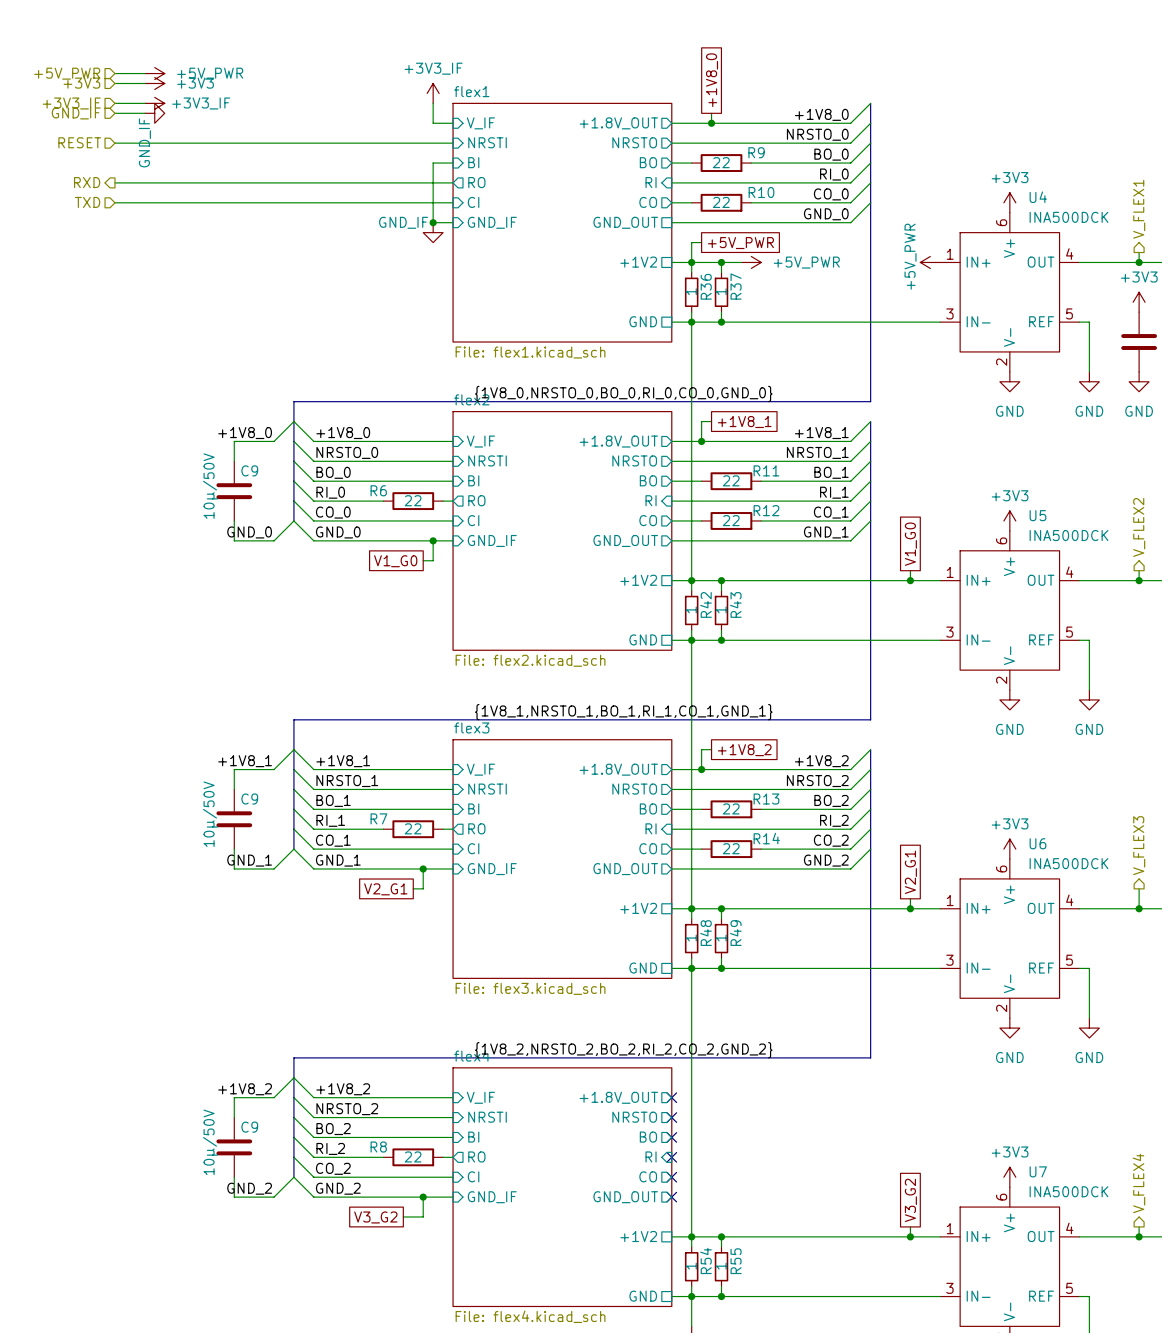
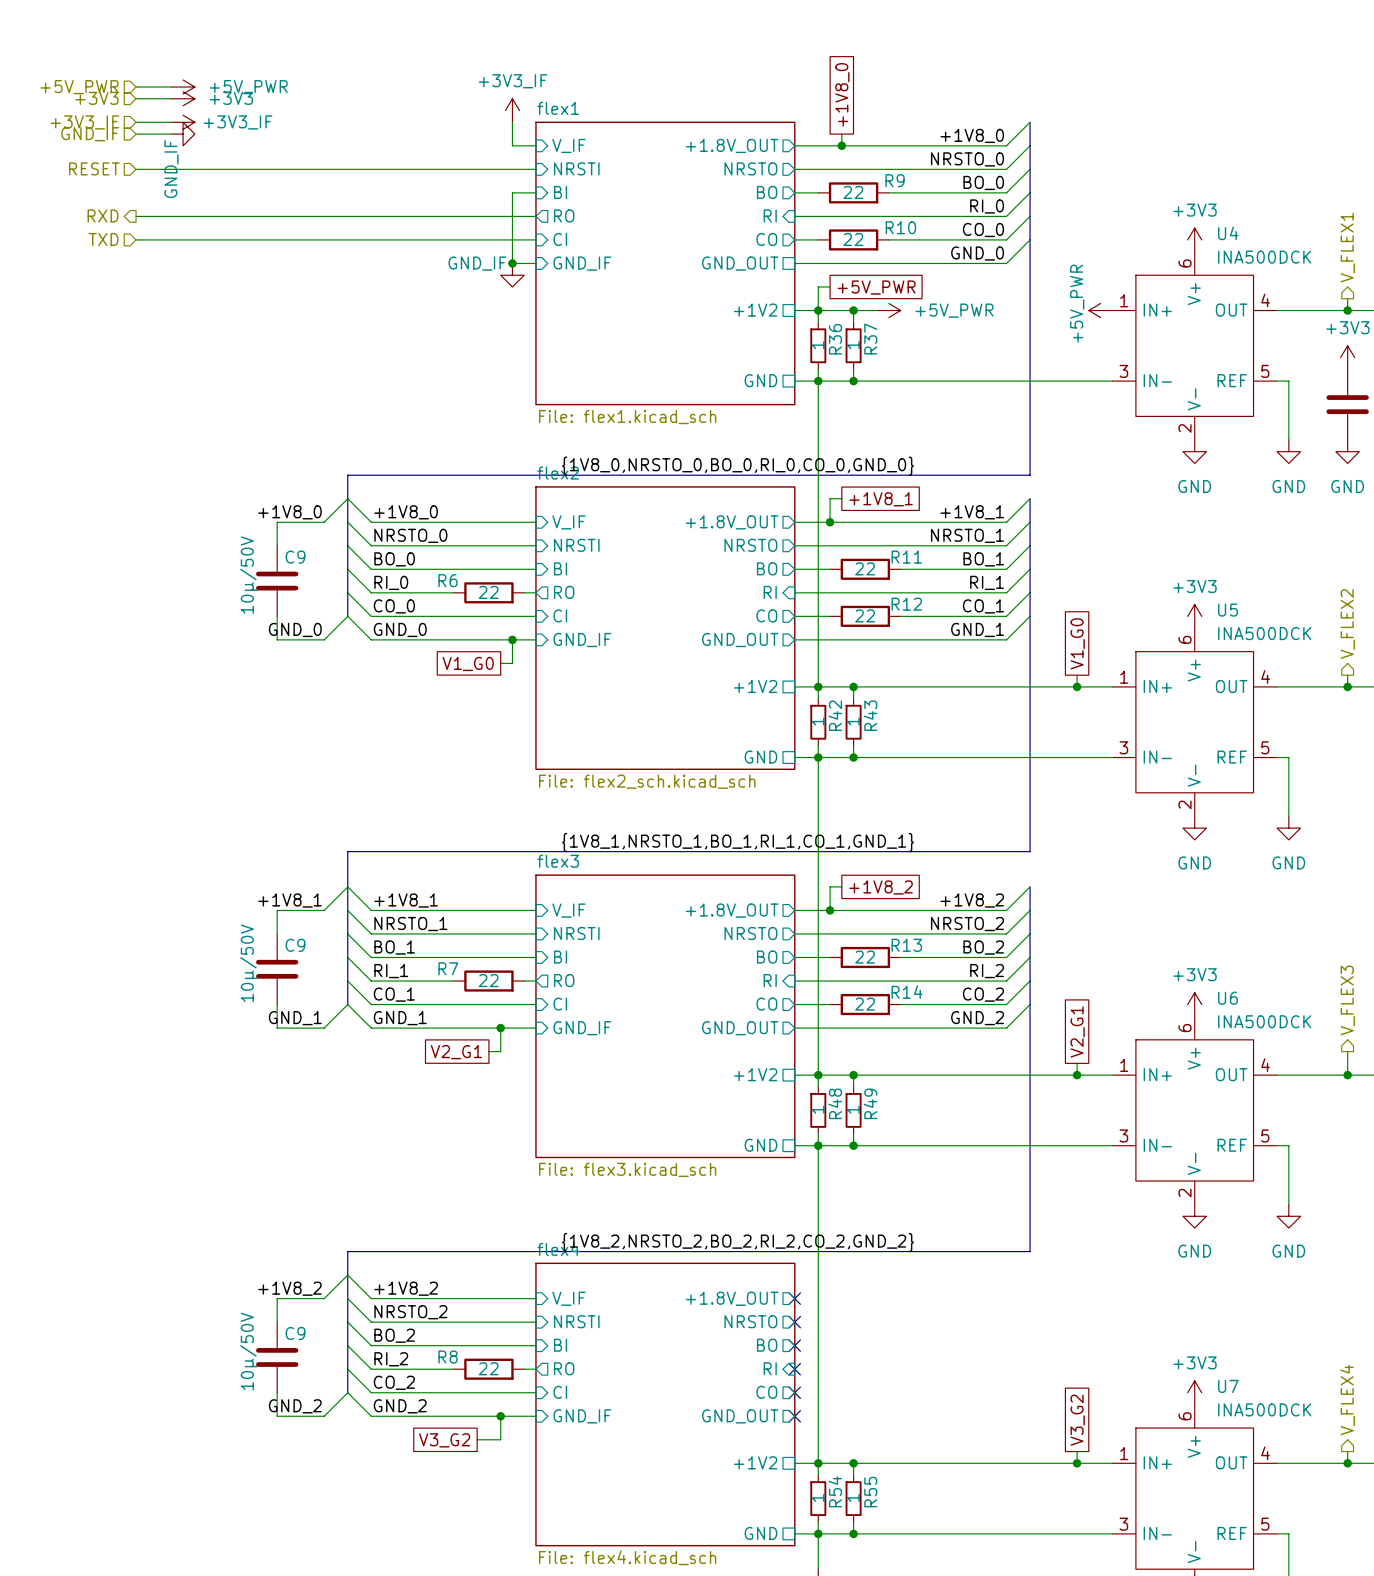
sheet flex2 value: File: flex2.kicad_sch (530, 660) -> File: flex2_sch.kicad_sch (647, 781)

